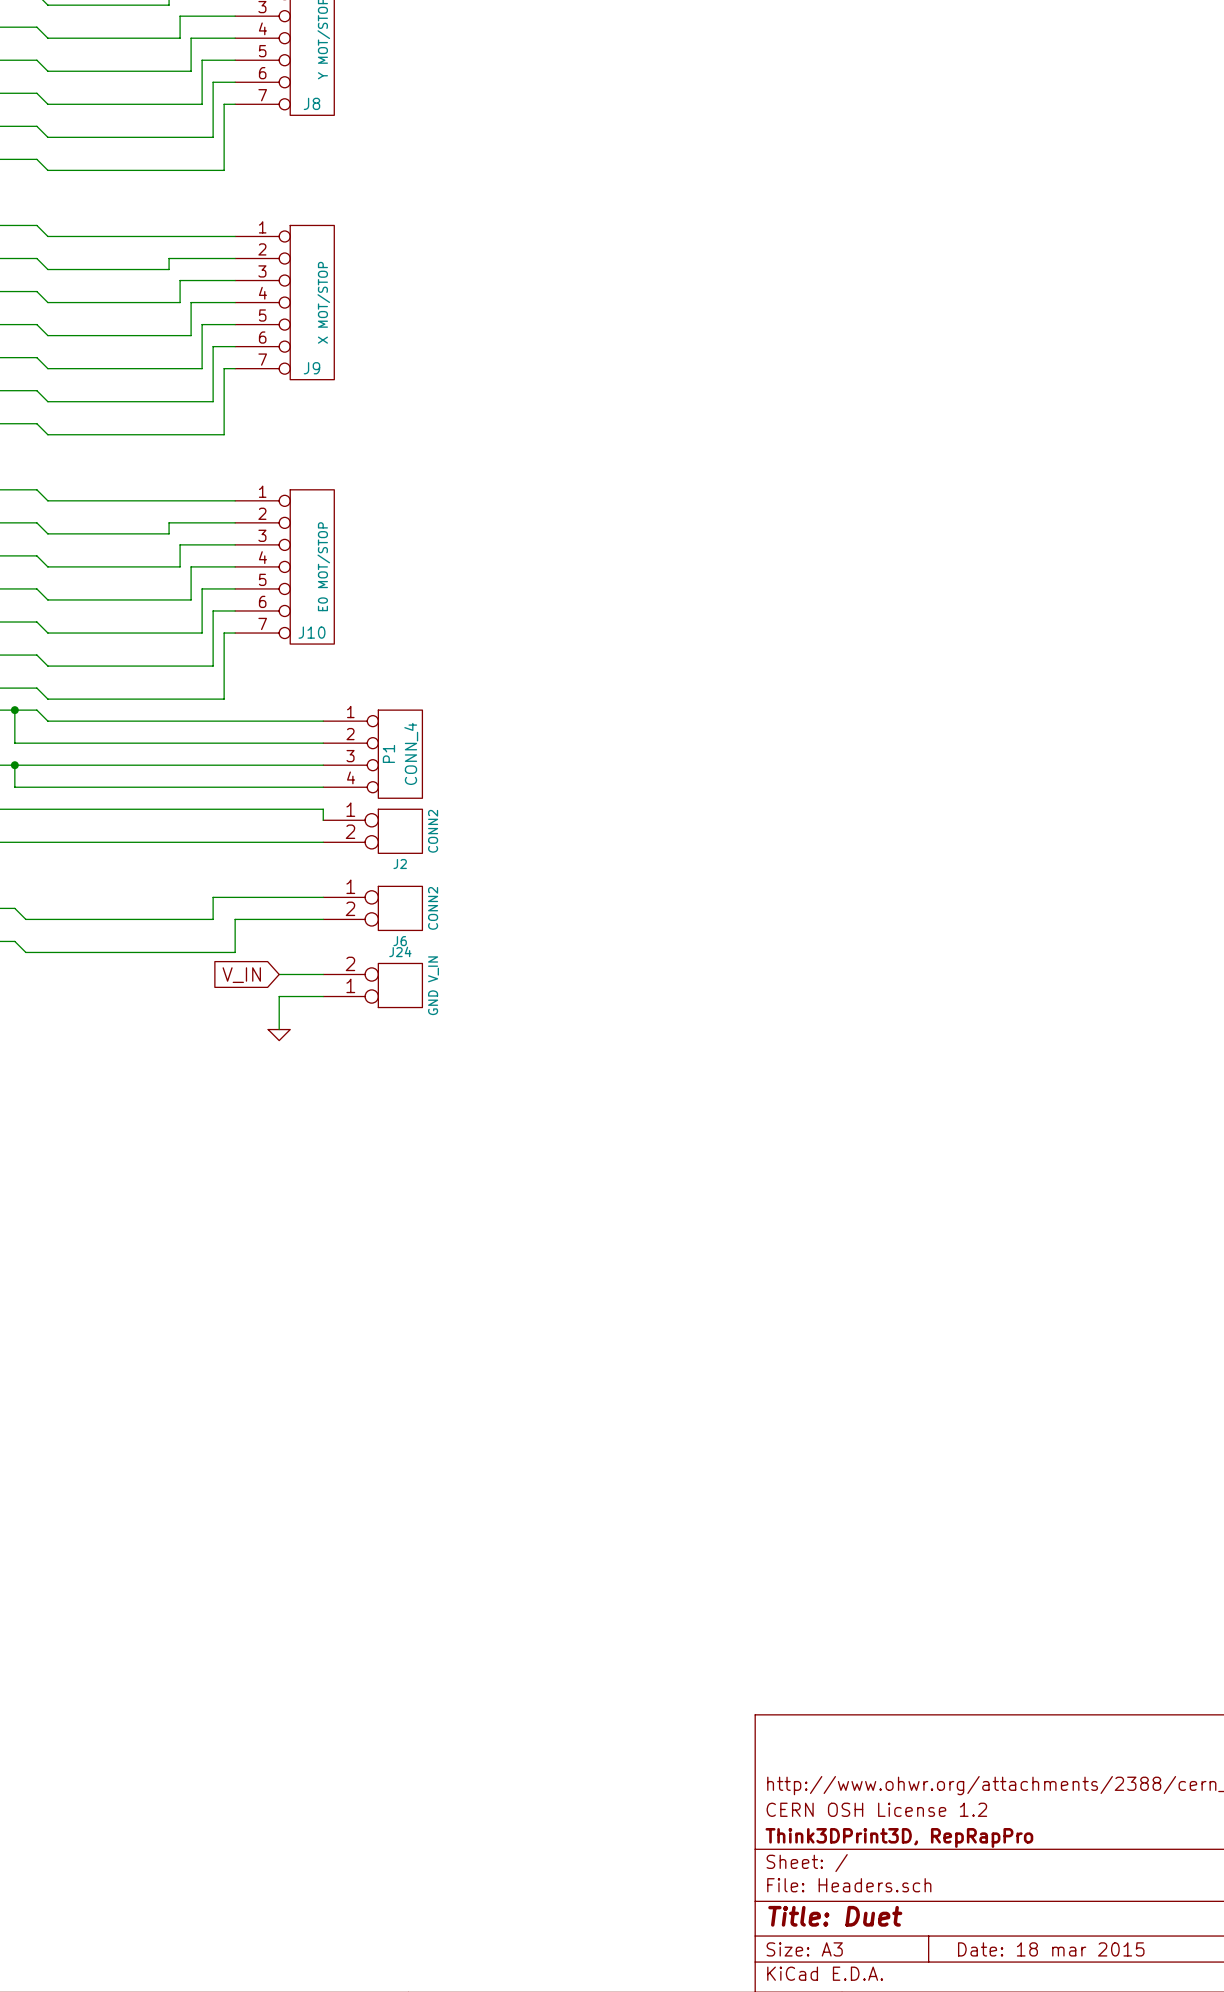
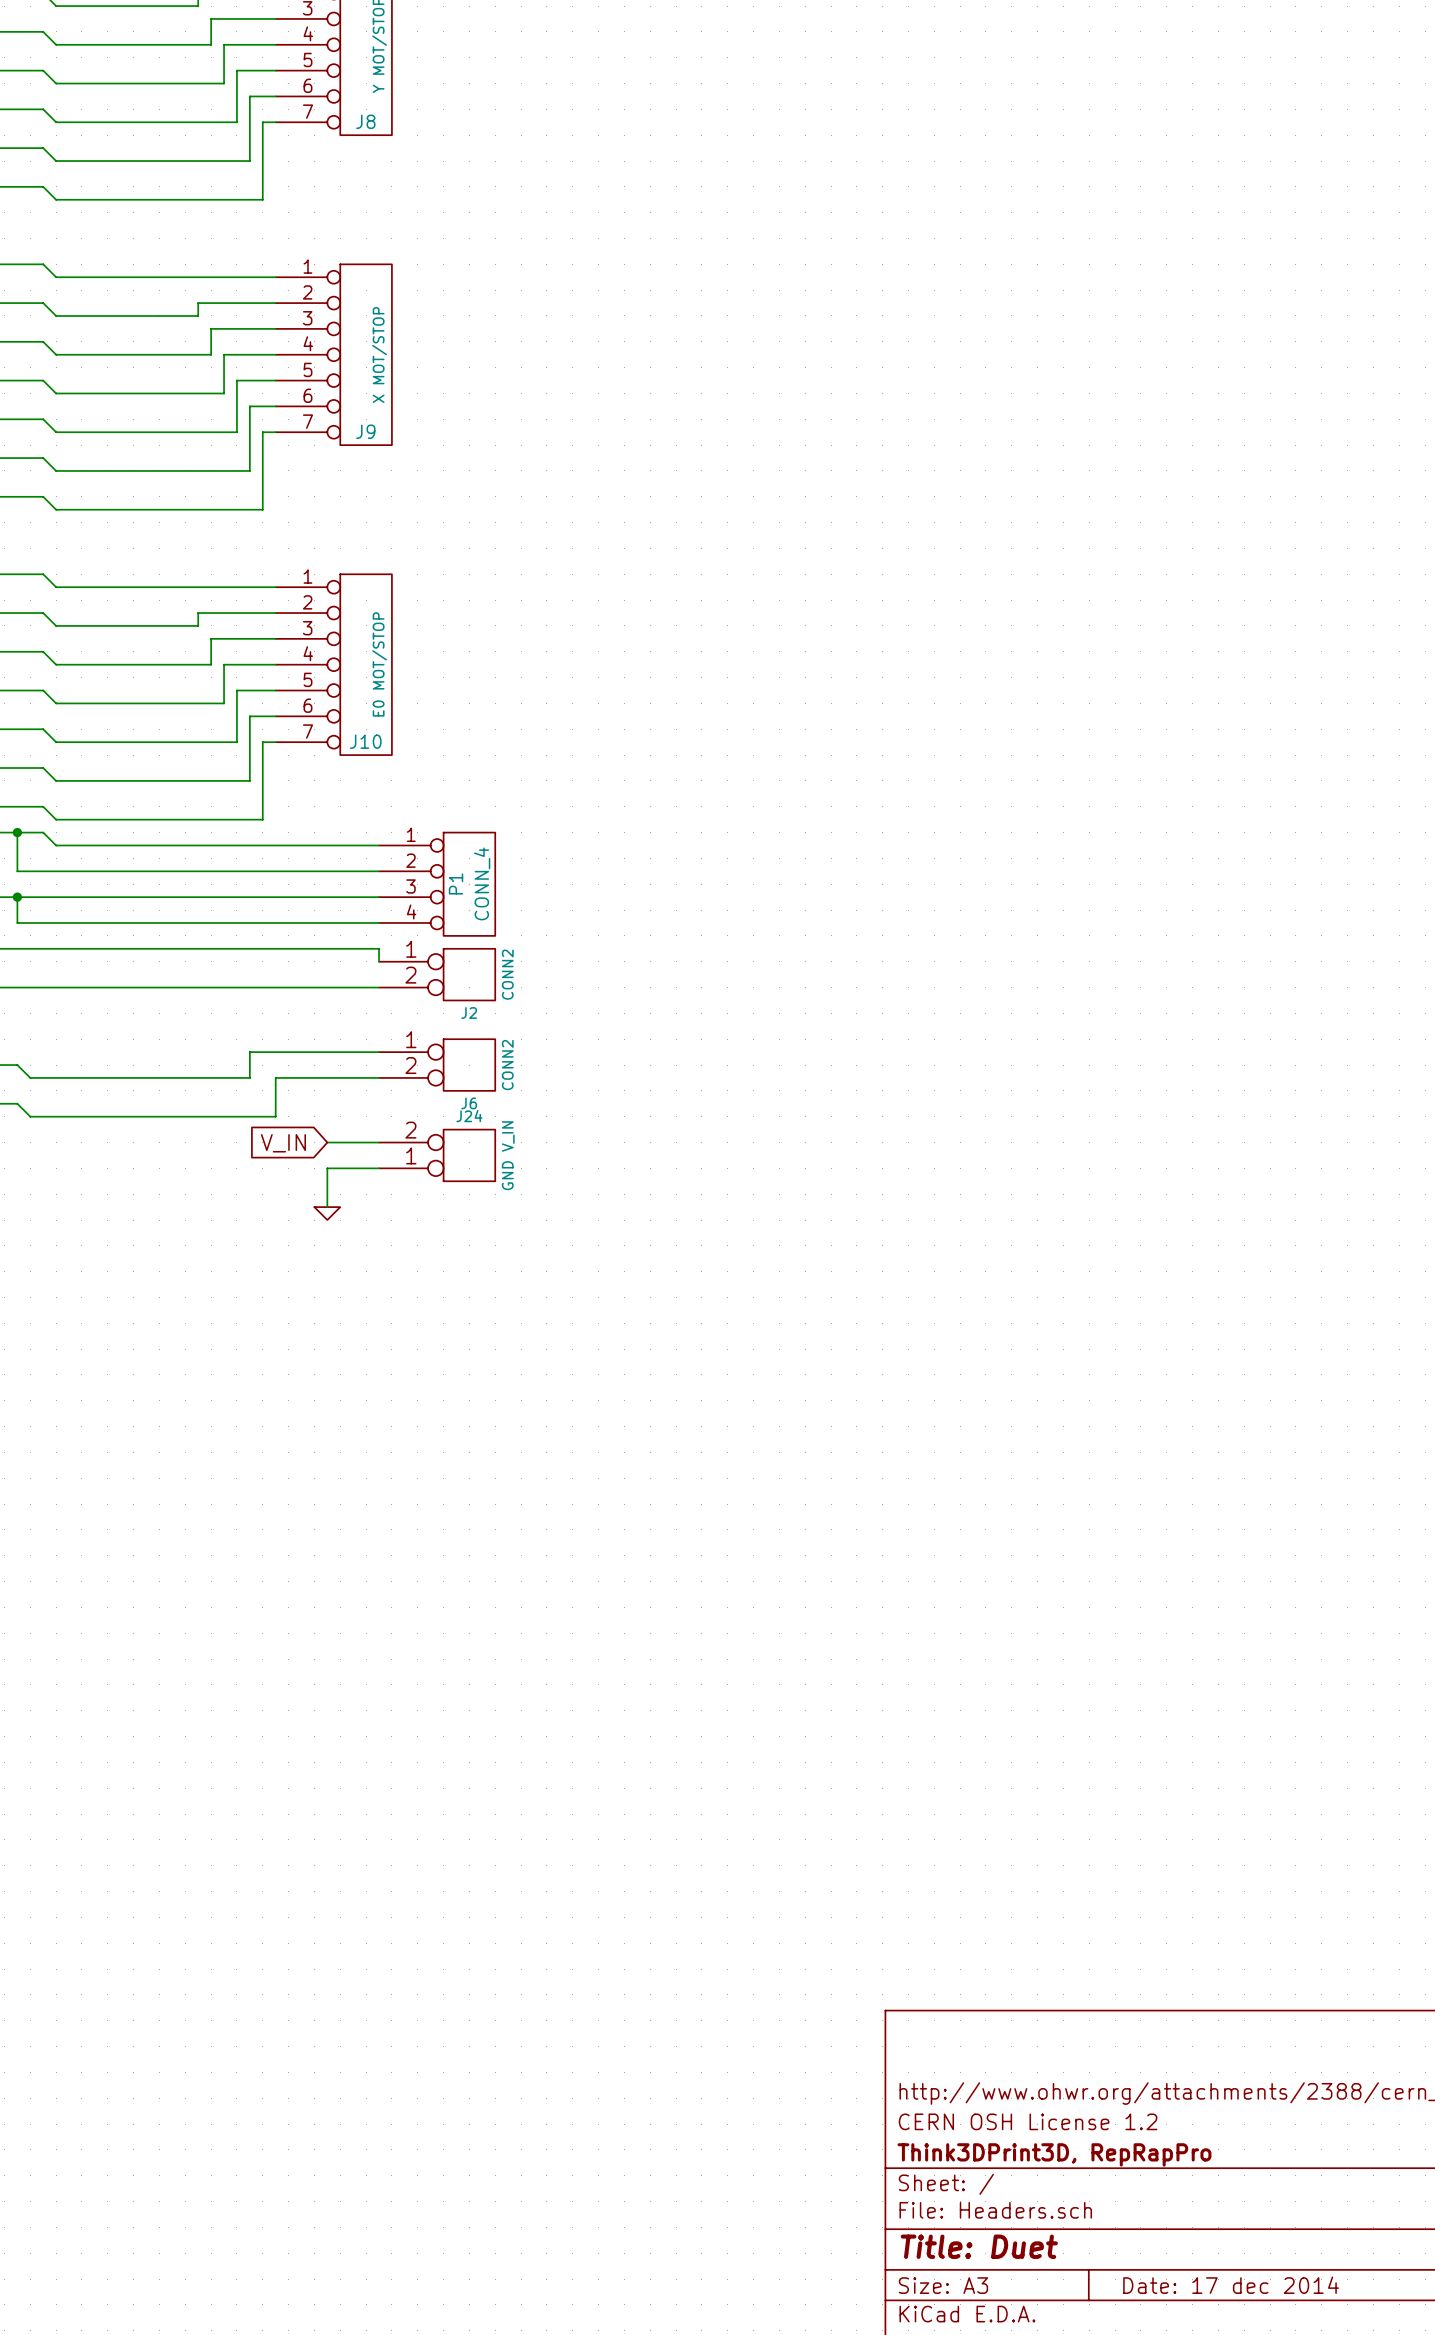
title block: Date: 18 mar 2015 (1051, 1949) -> Date: 17 dec 2014 (1231, 2285)

